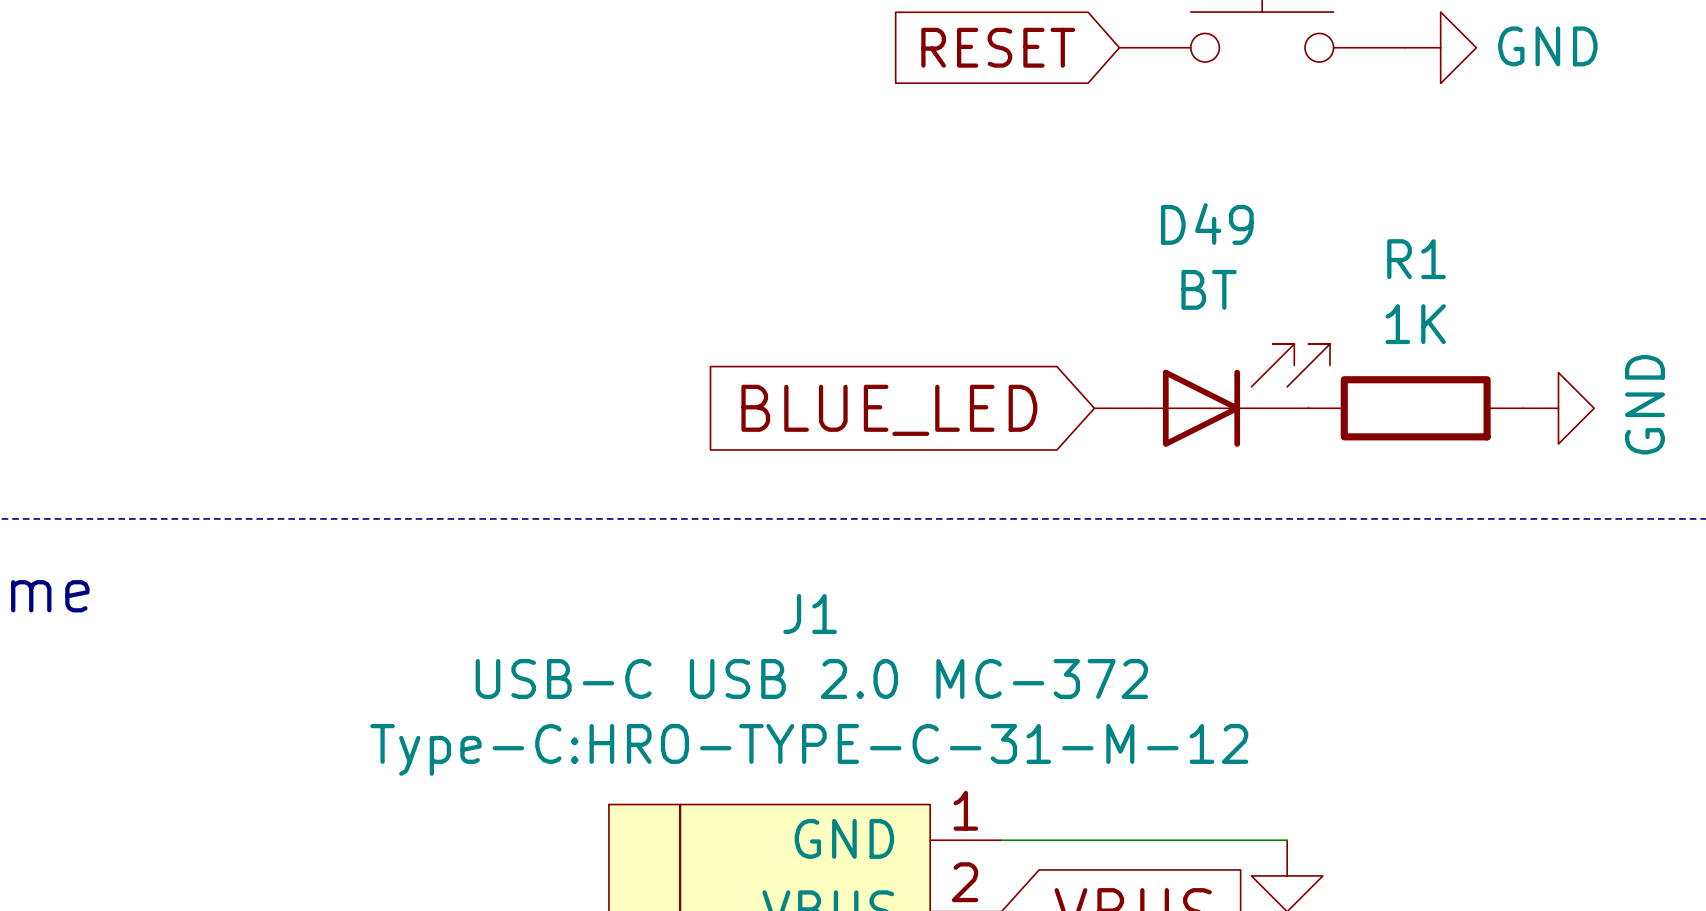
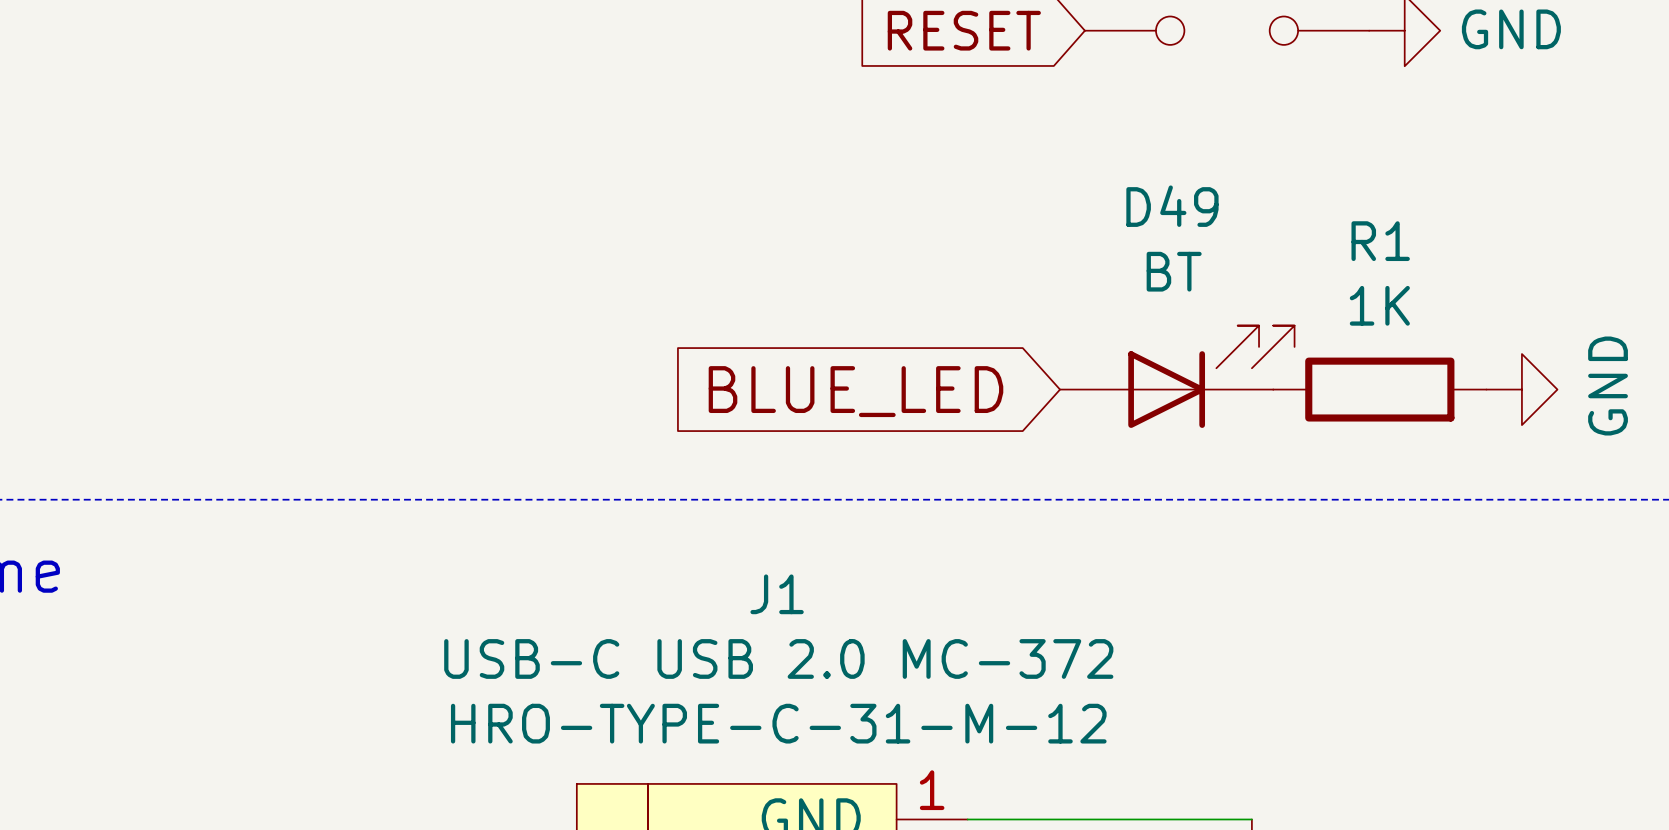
J1 text: Type-C:HRO-TYPE-C-31-M-12 (809, 749) -> HRO-TYPE-C-31-M-12 (778, 723)

